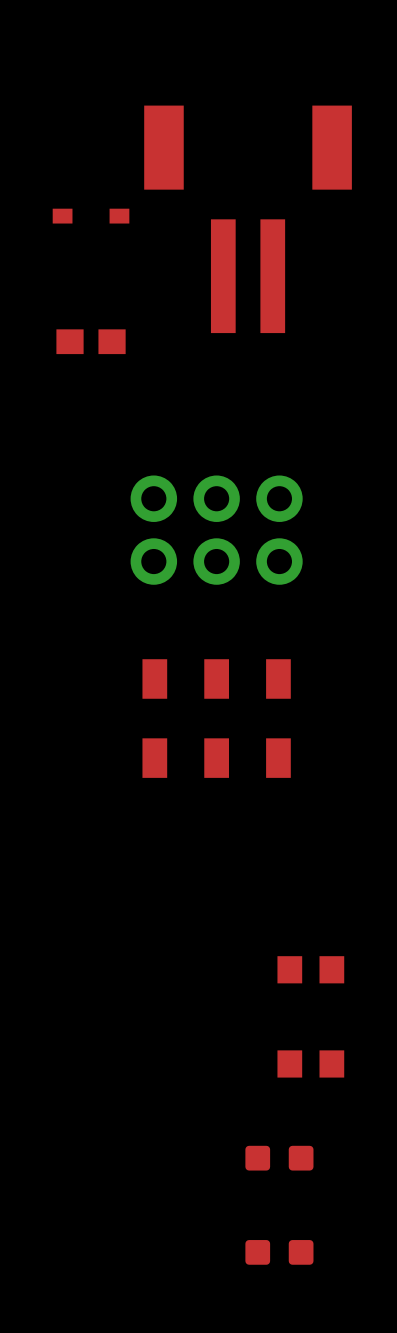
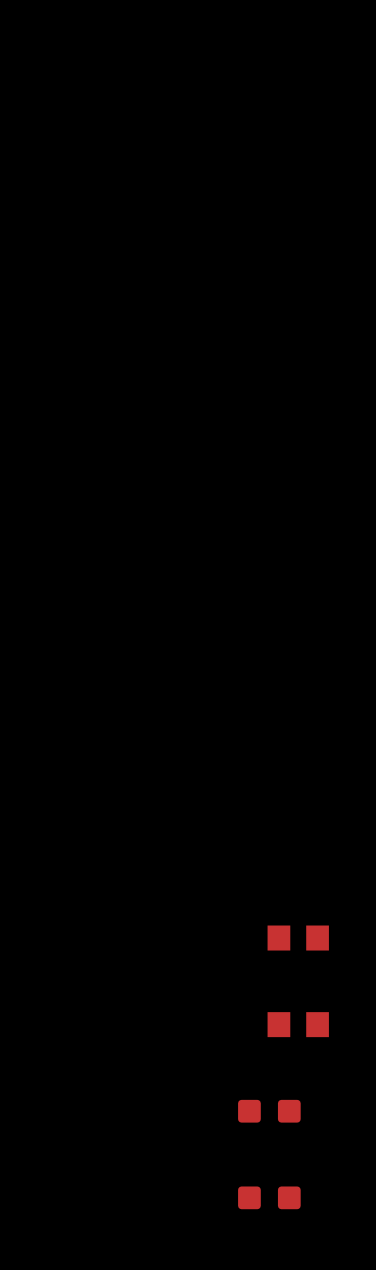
part: (91, 216) -> none
part: (248, 219) -> none
part: (91, 341) -> none
part: (216, 530) -> none
part: (216, 718) -> none

